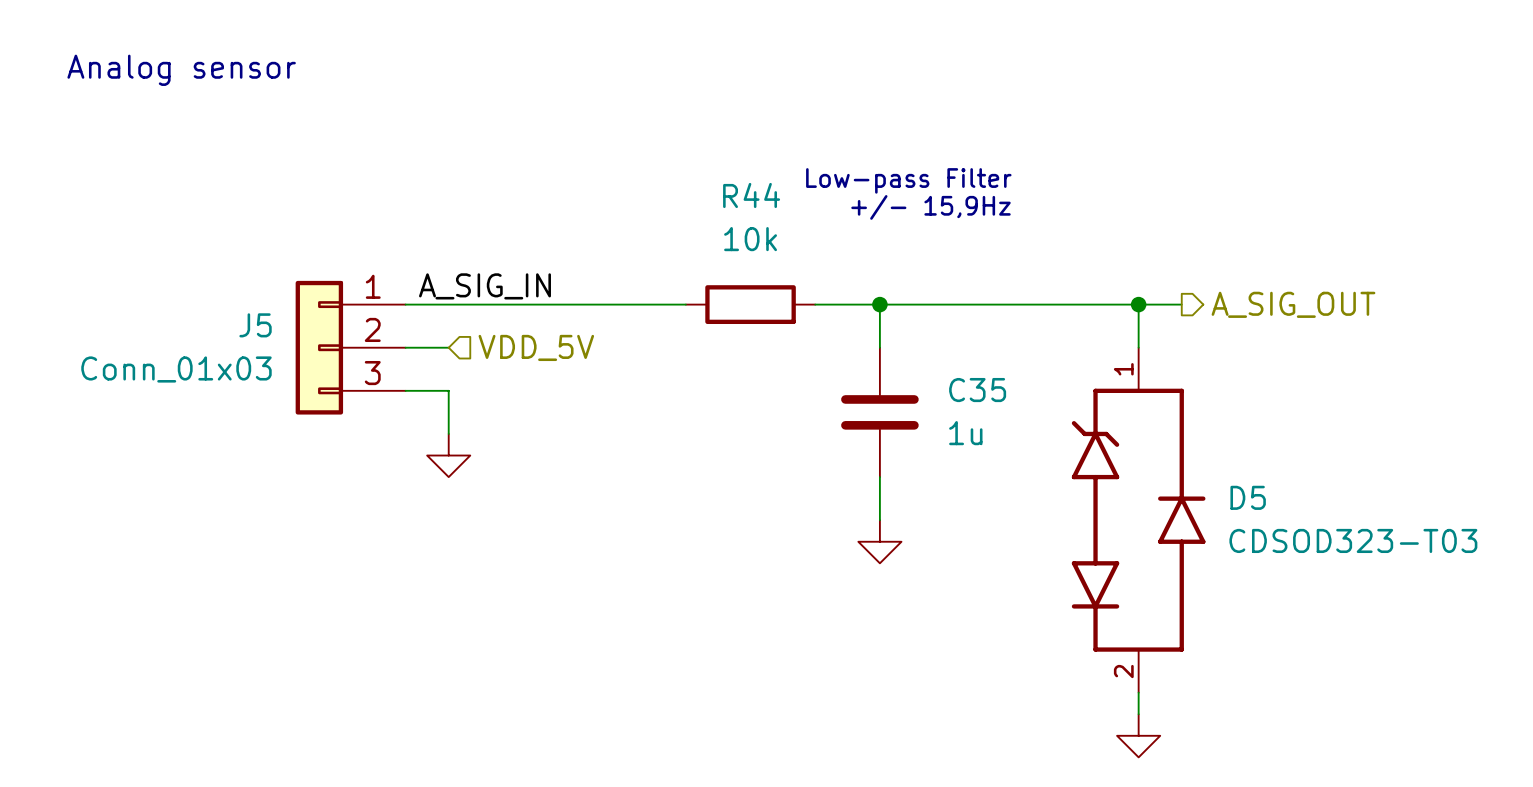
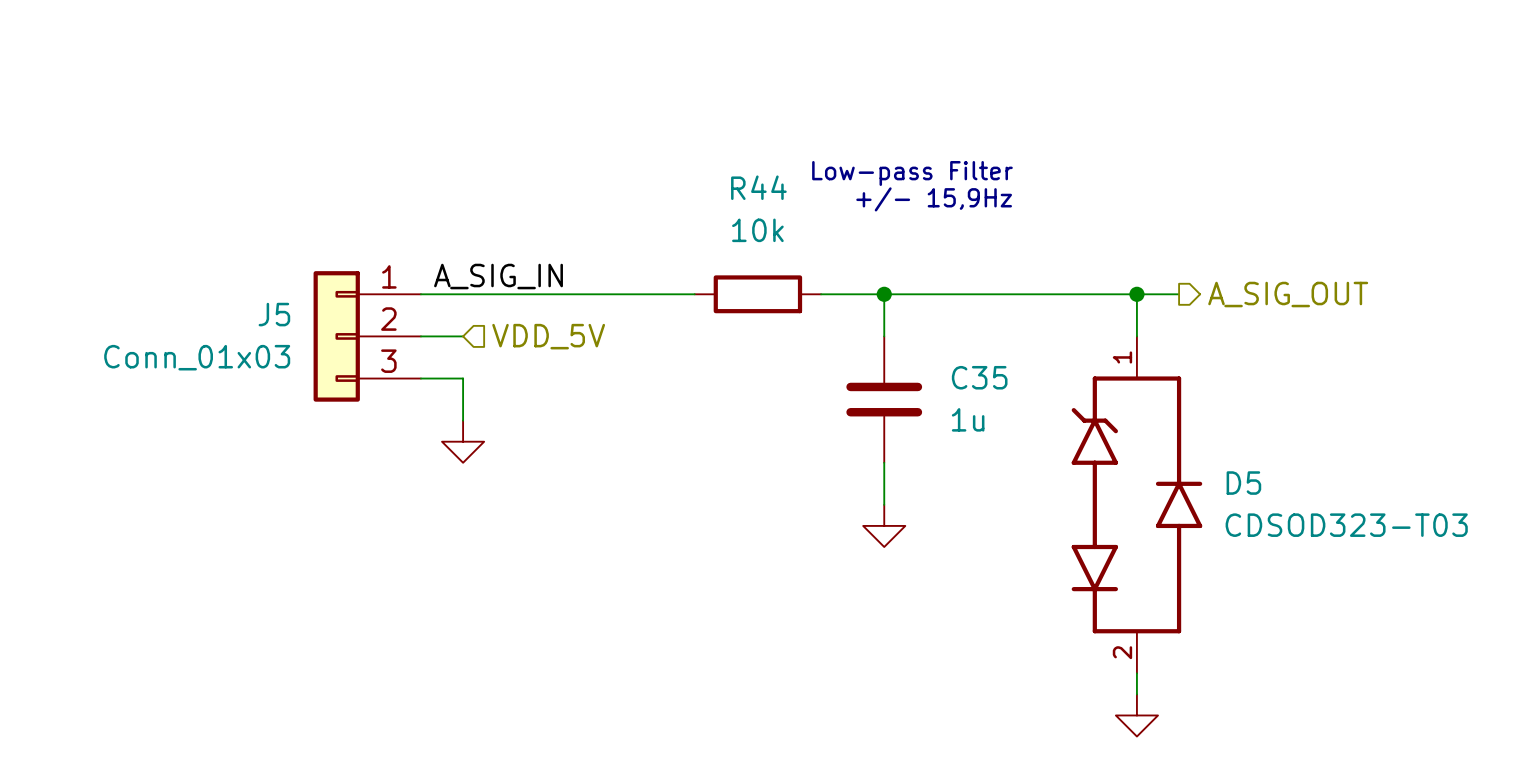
text: Analog sensor (181, 70) -> none

